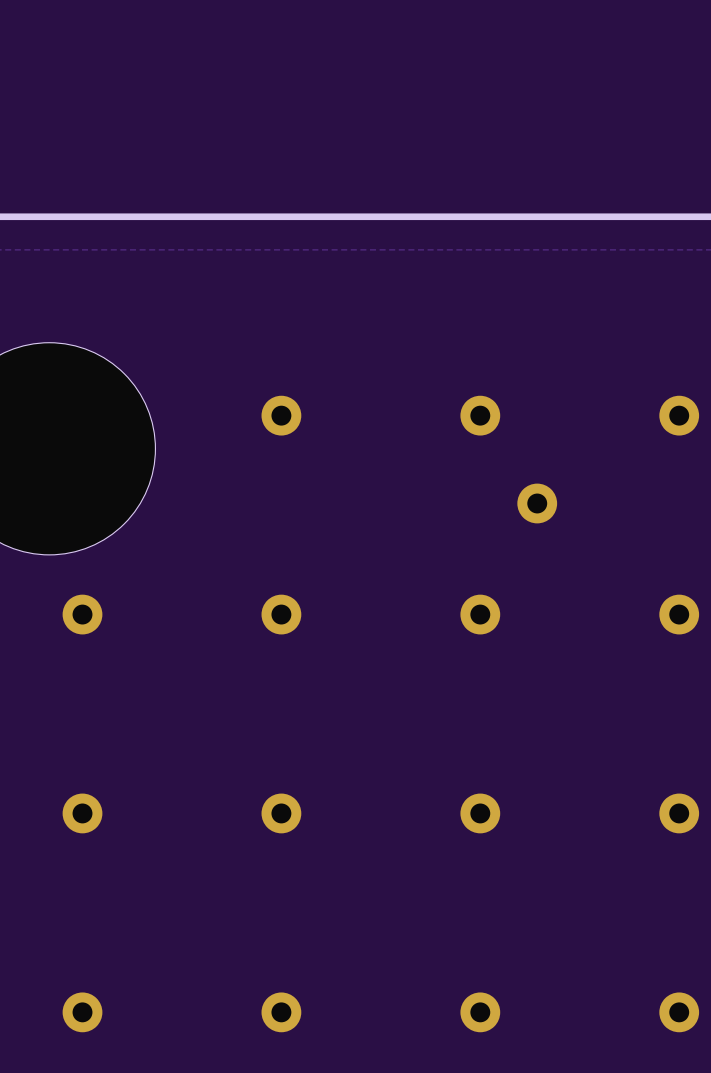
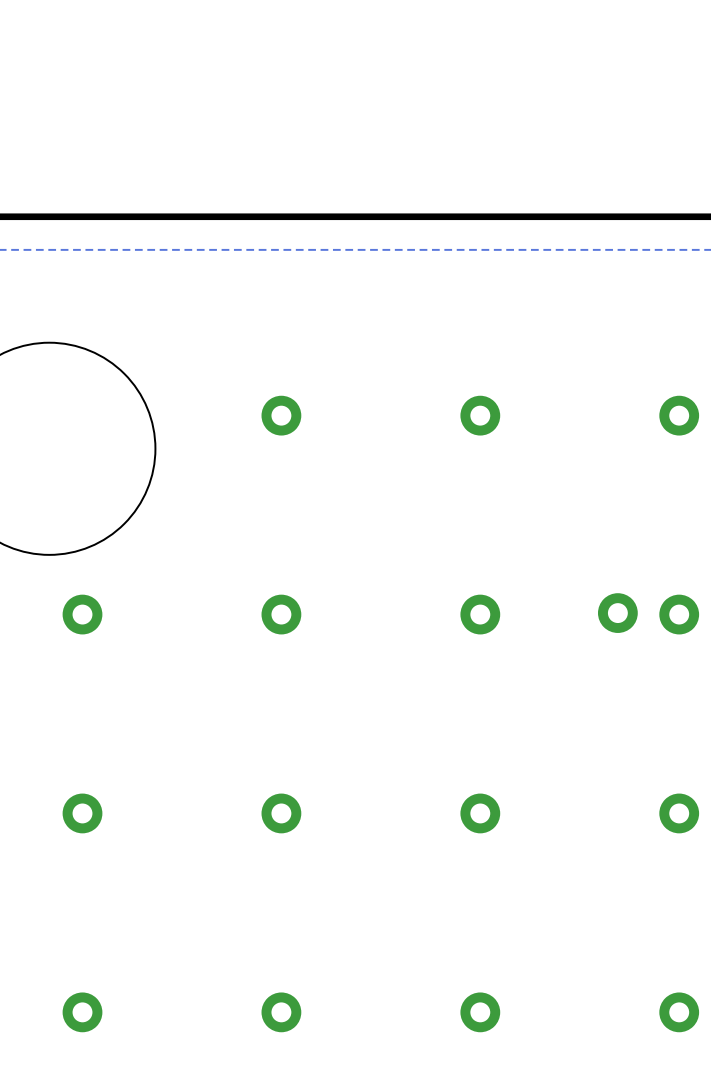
via position: (537, 503) -> (617, 613)

